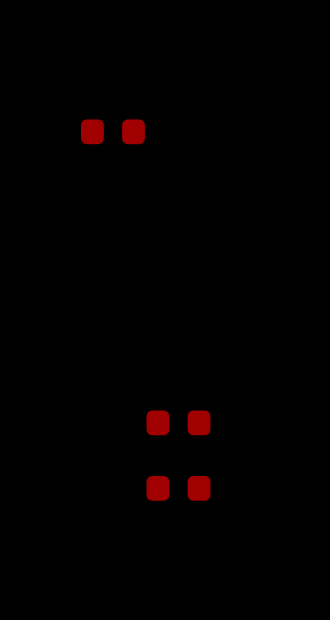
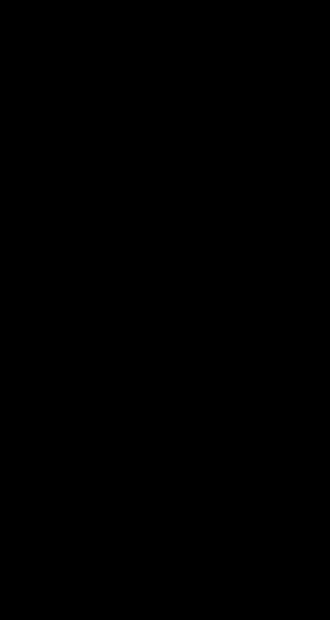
part: (112, 131) -> none
part: (178, 422) -> none
part: (178, 488) -> none

